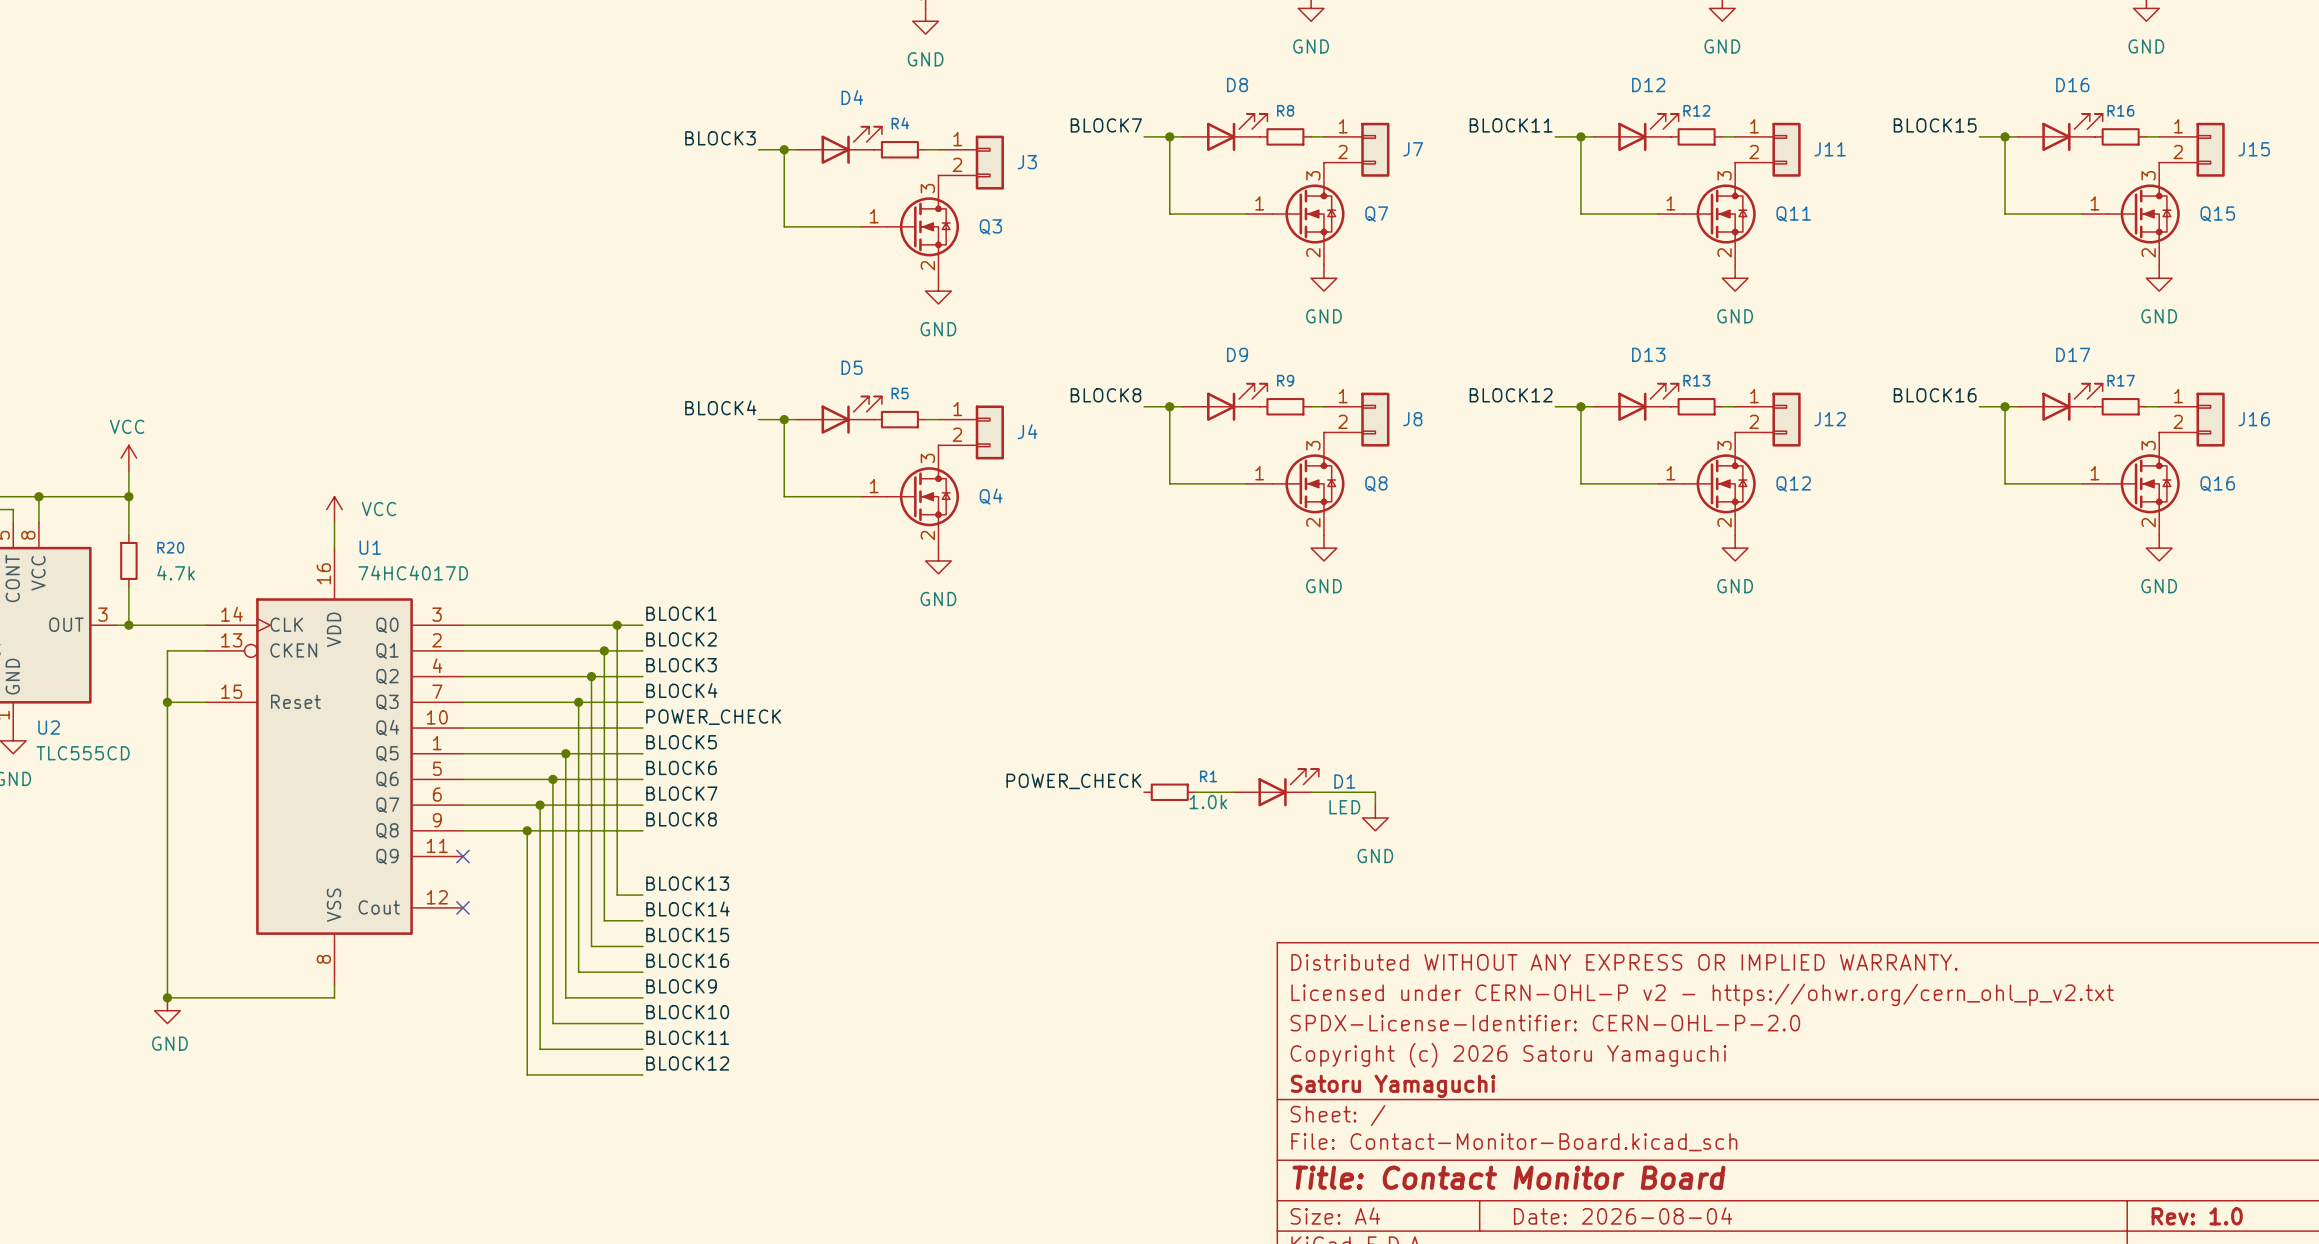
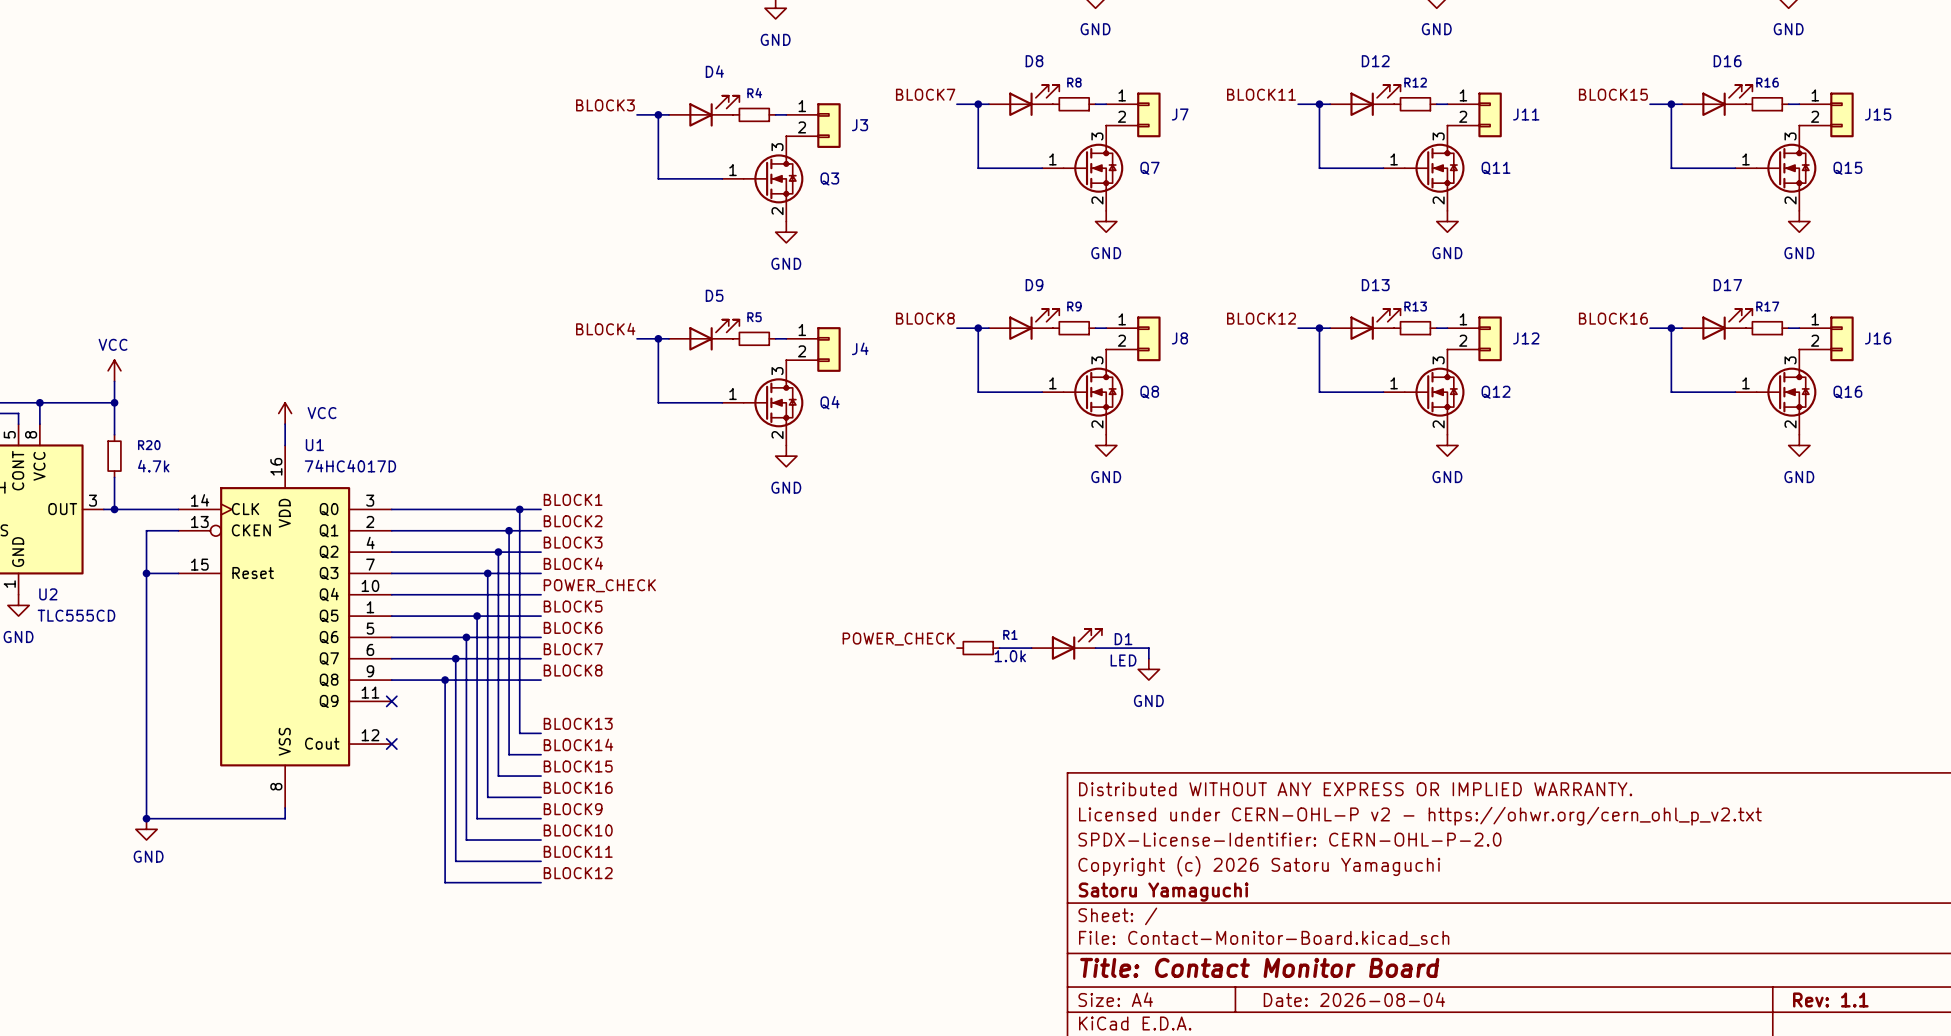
title block: Rev: 1.0 (2197, 1216) -> Rev: 1.1 (1830, 999)

